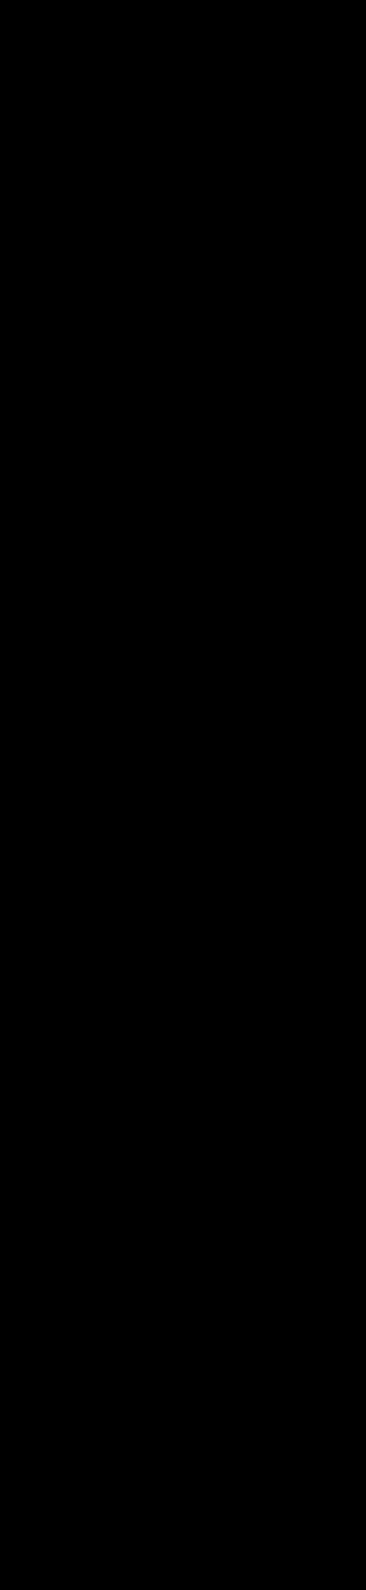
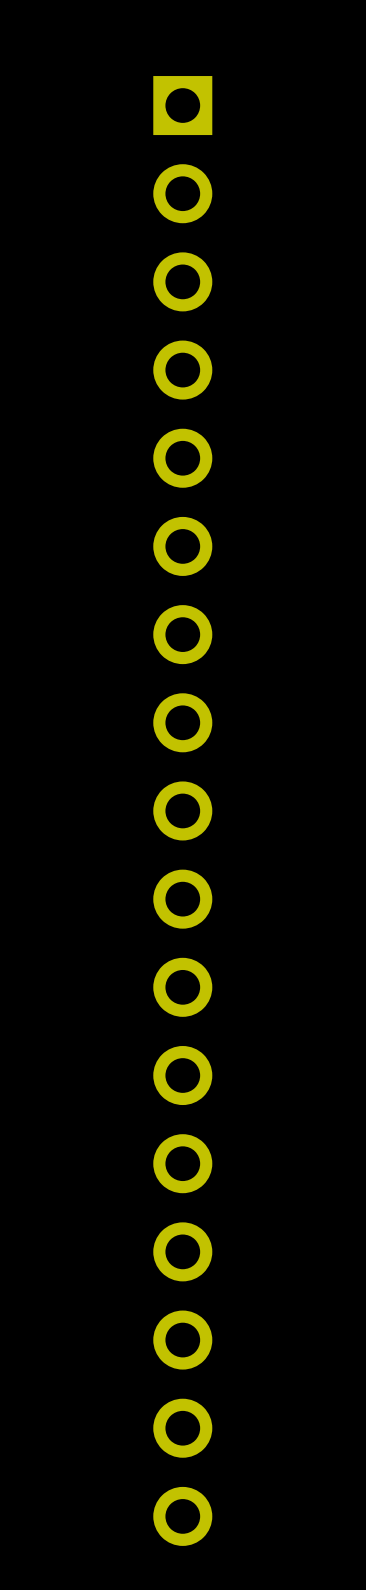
part: none -> (182, 810)

